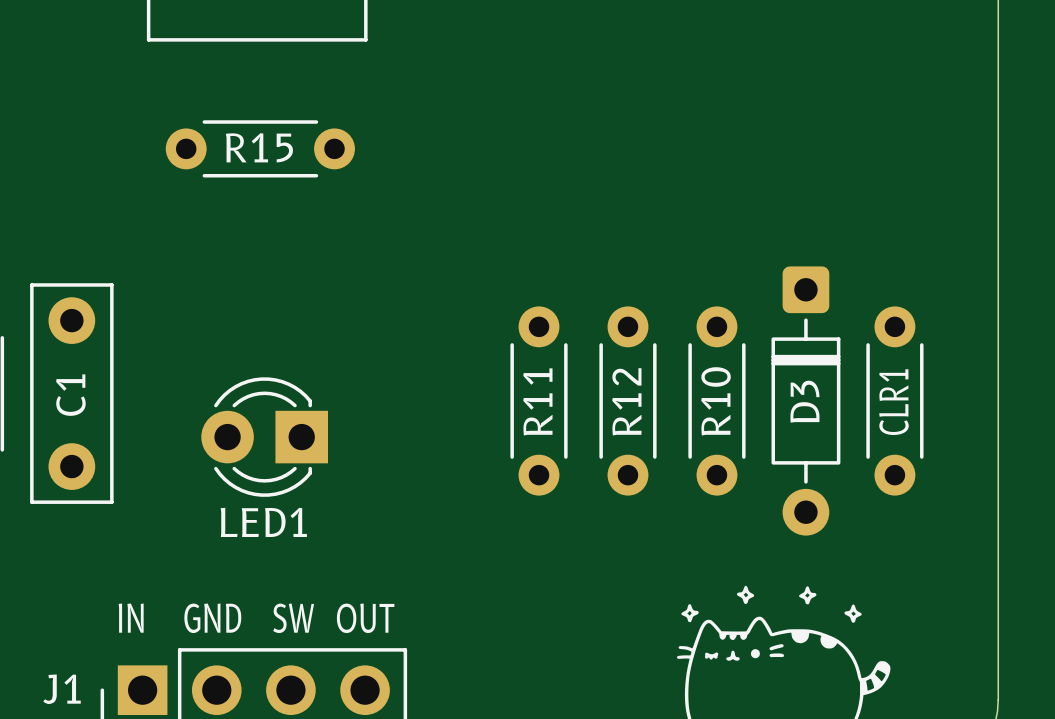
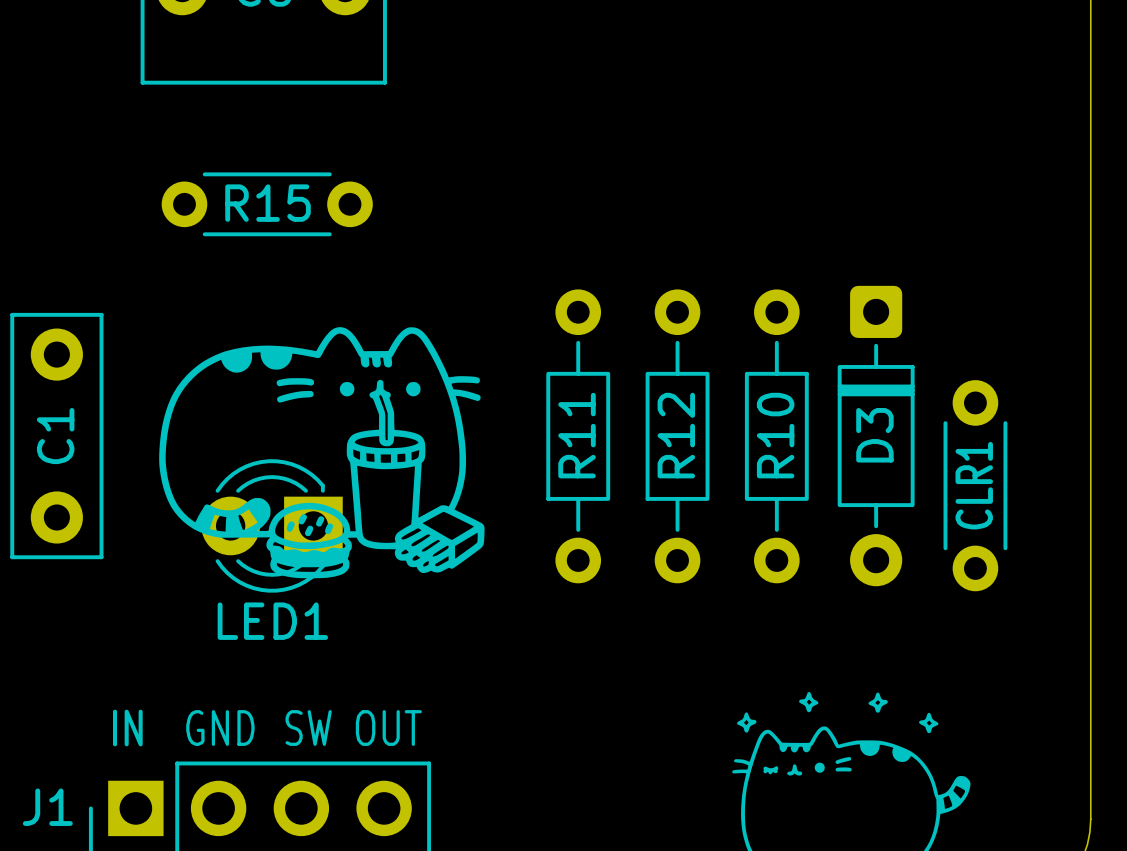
drawing: none -> [159, 327, 485, 579]
R11 footprint: [510, 306, 568, 496] -> [546, 289, 611, 584]
R12 footprint: [599, 306, 657, 496] -> [645, 289, 710, 584]
R10 footprint: [688, 306, 746, 496] -> [744, 289, 809, 584]
C1 position: (71, 393) -> (56, 436)
D3 position: (805, 400) -> (876, 436)

